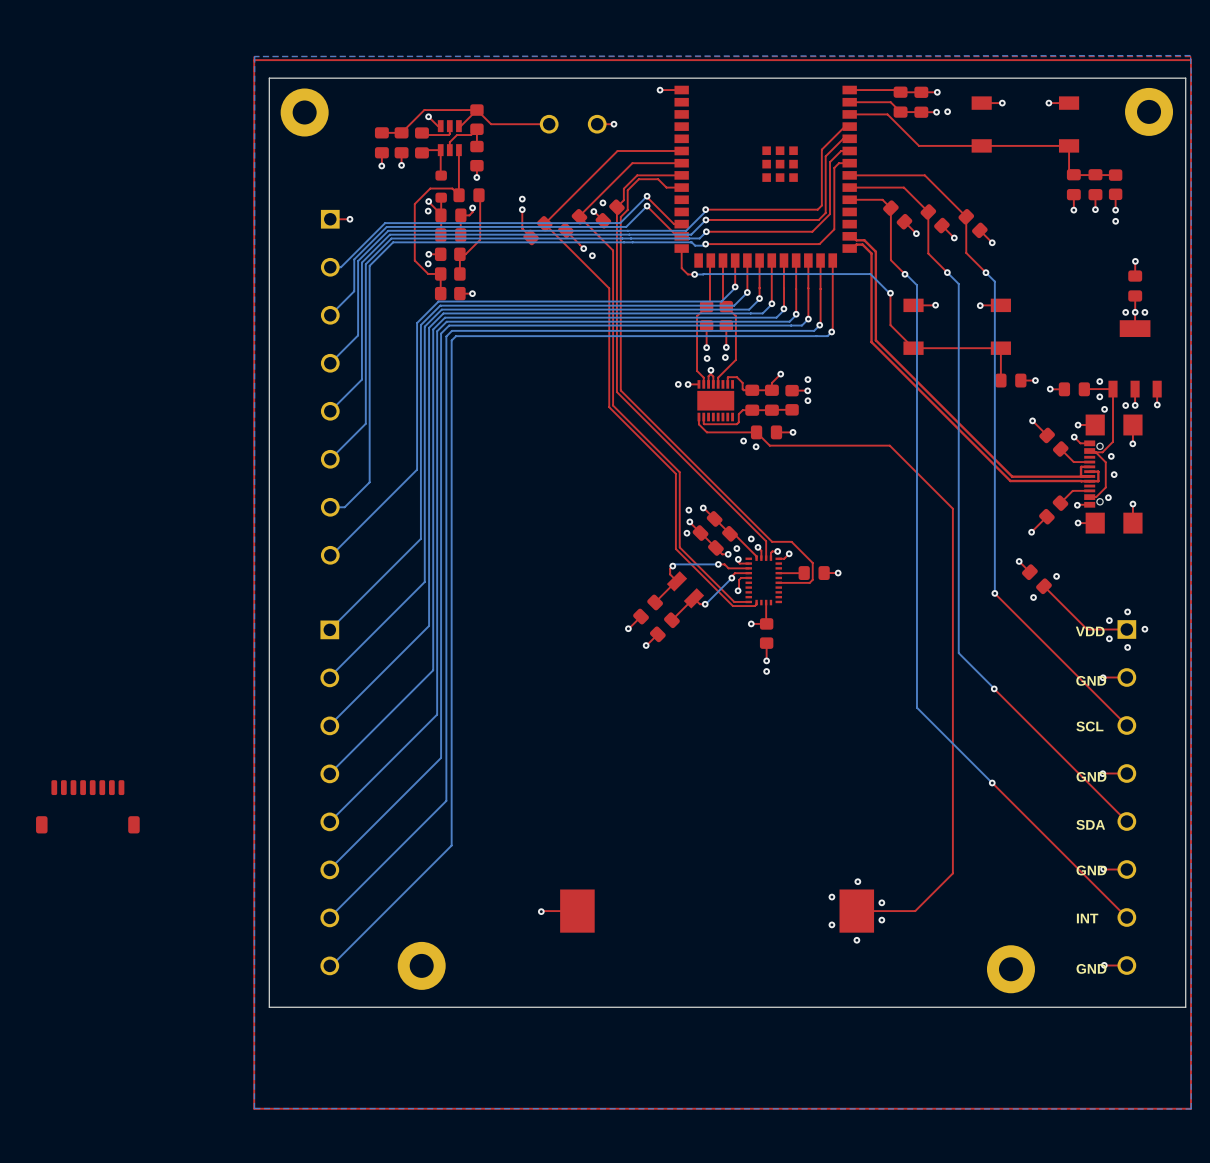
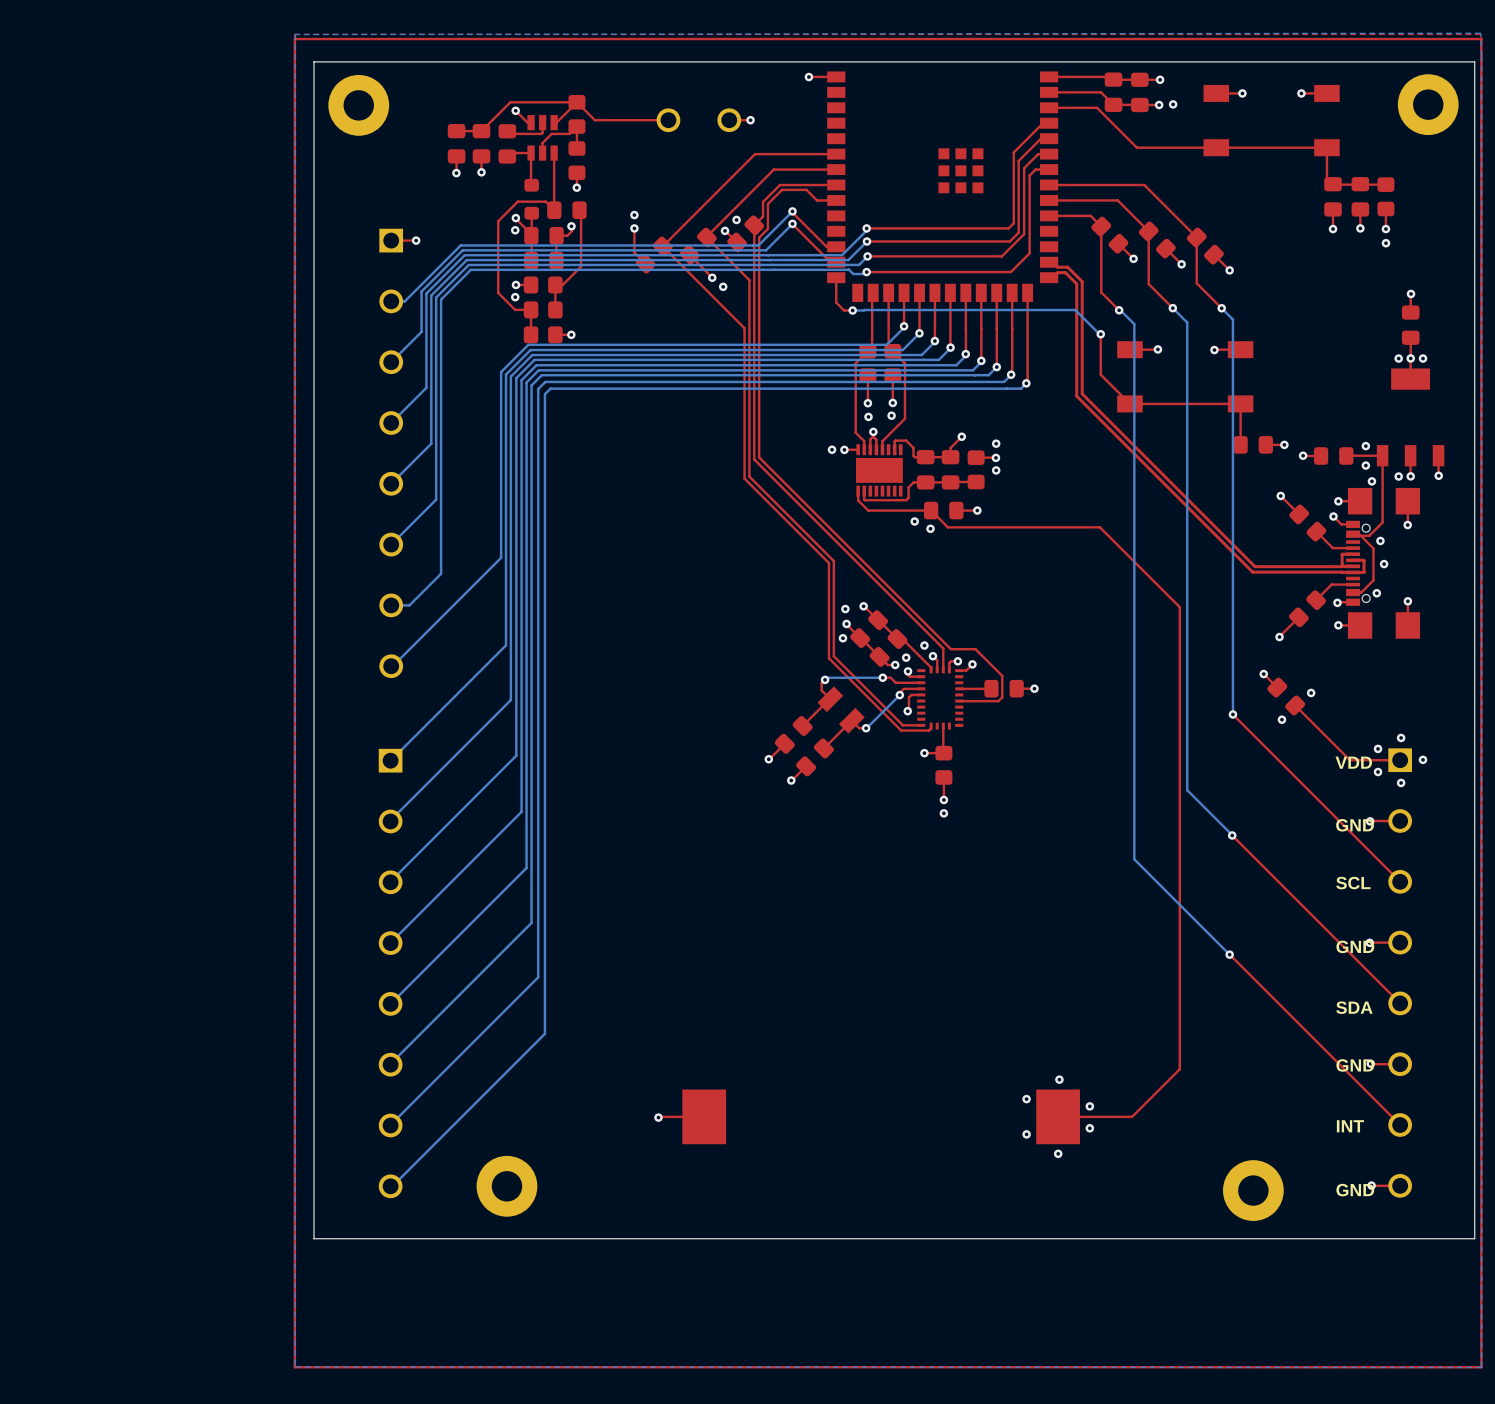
part: (87, 806) -> none

